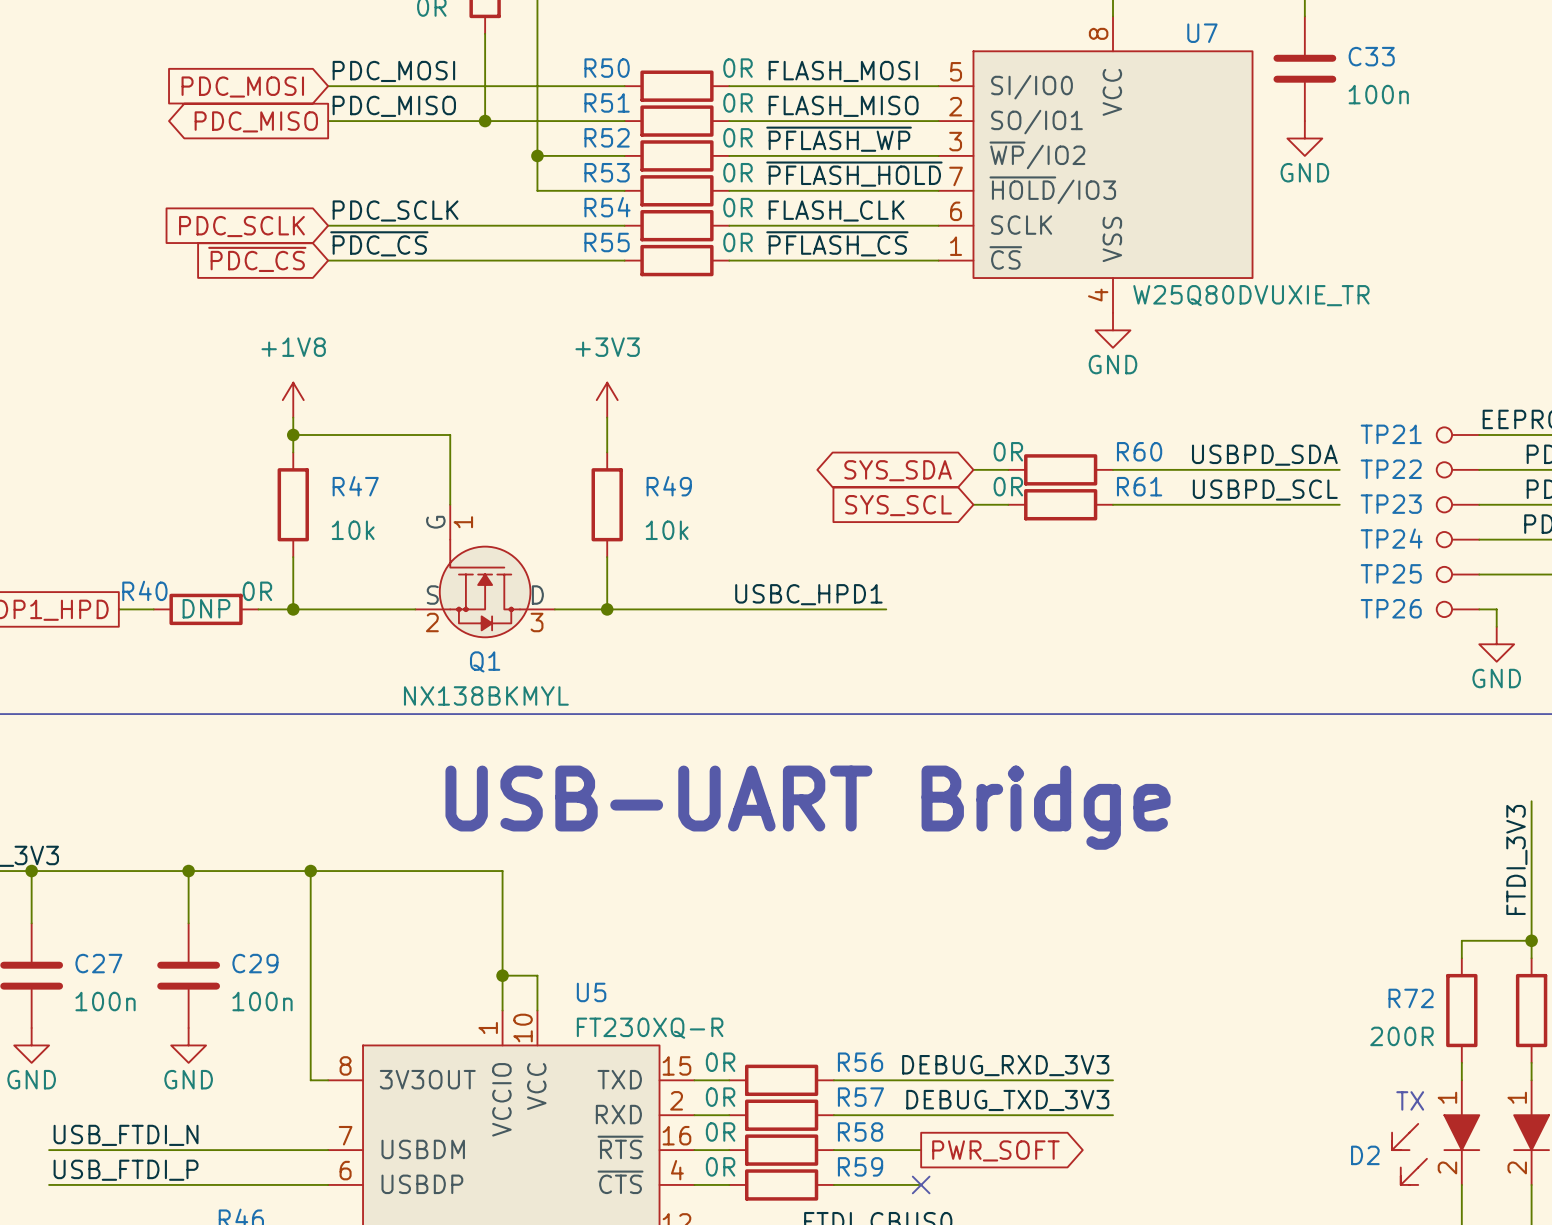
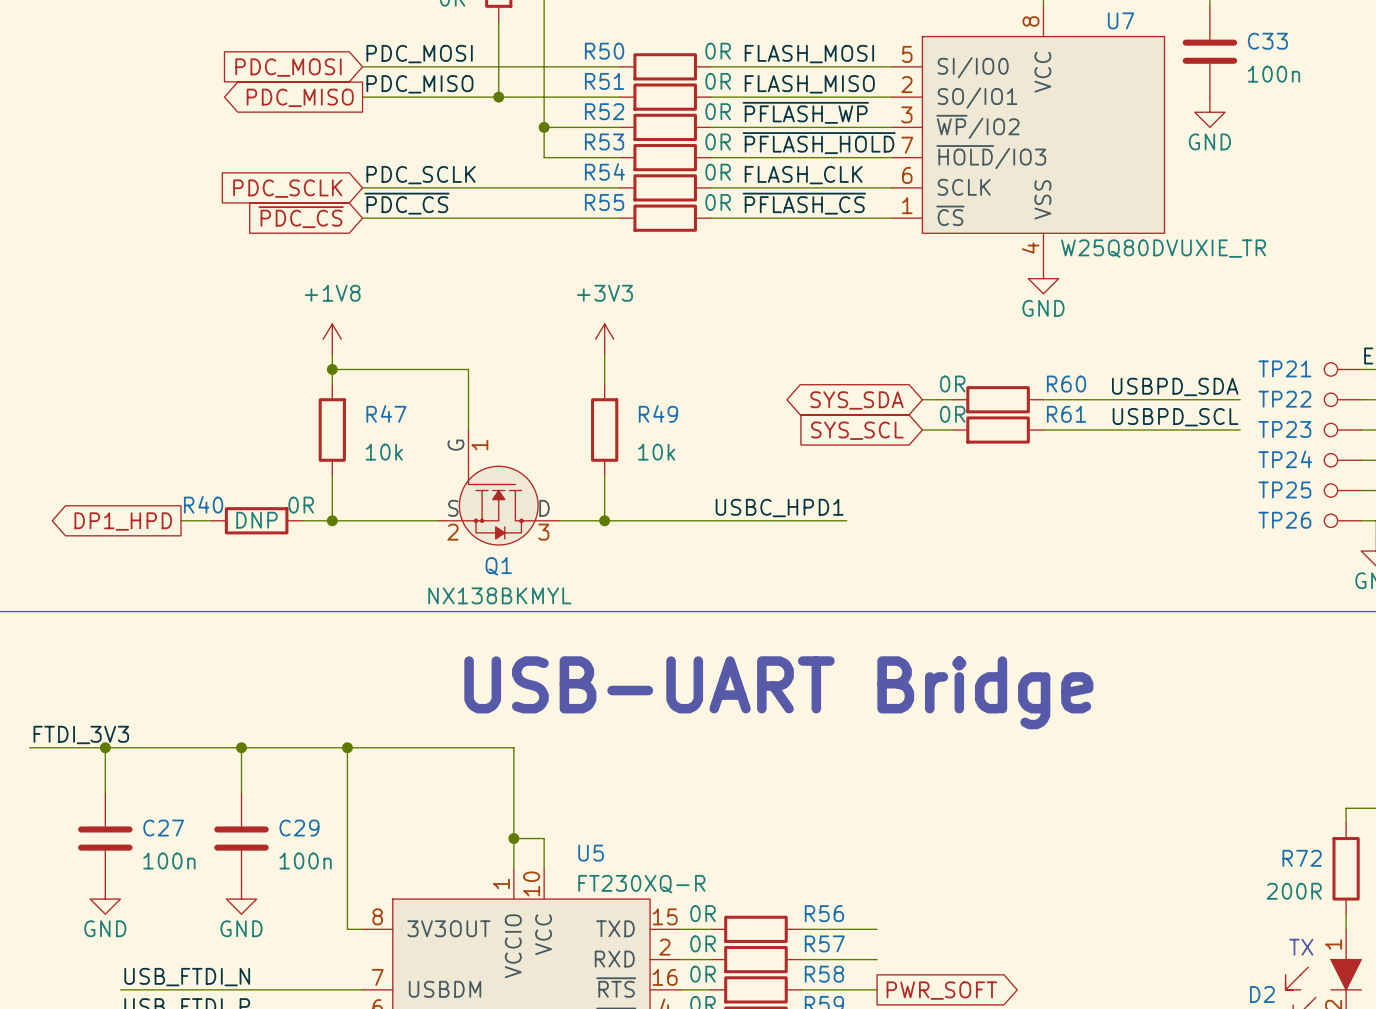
label: DEBUG_RXD_3V3 (1005, 1065) -> none
wire: (921, 1080) (1113, 1080) -> none
label: DEBUG_TXD_3V3 (1007, 1100) -> none
wire: (921, 1115) (1113, 1115) -> none

